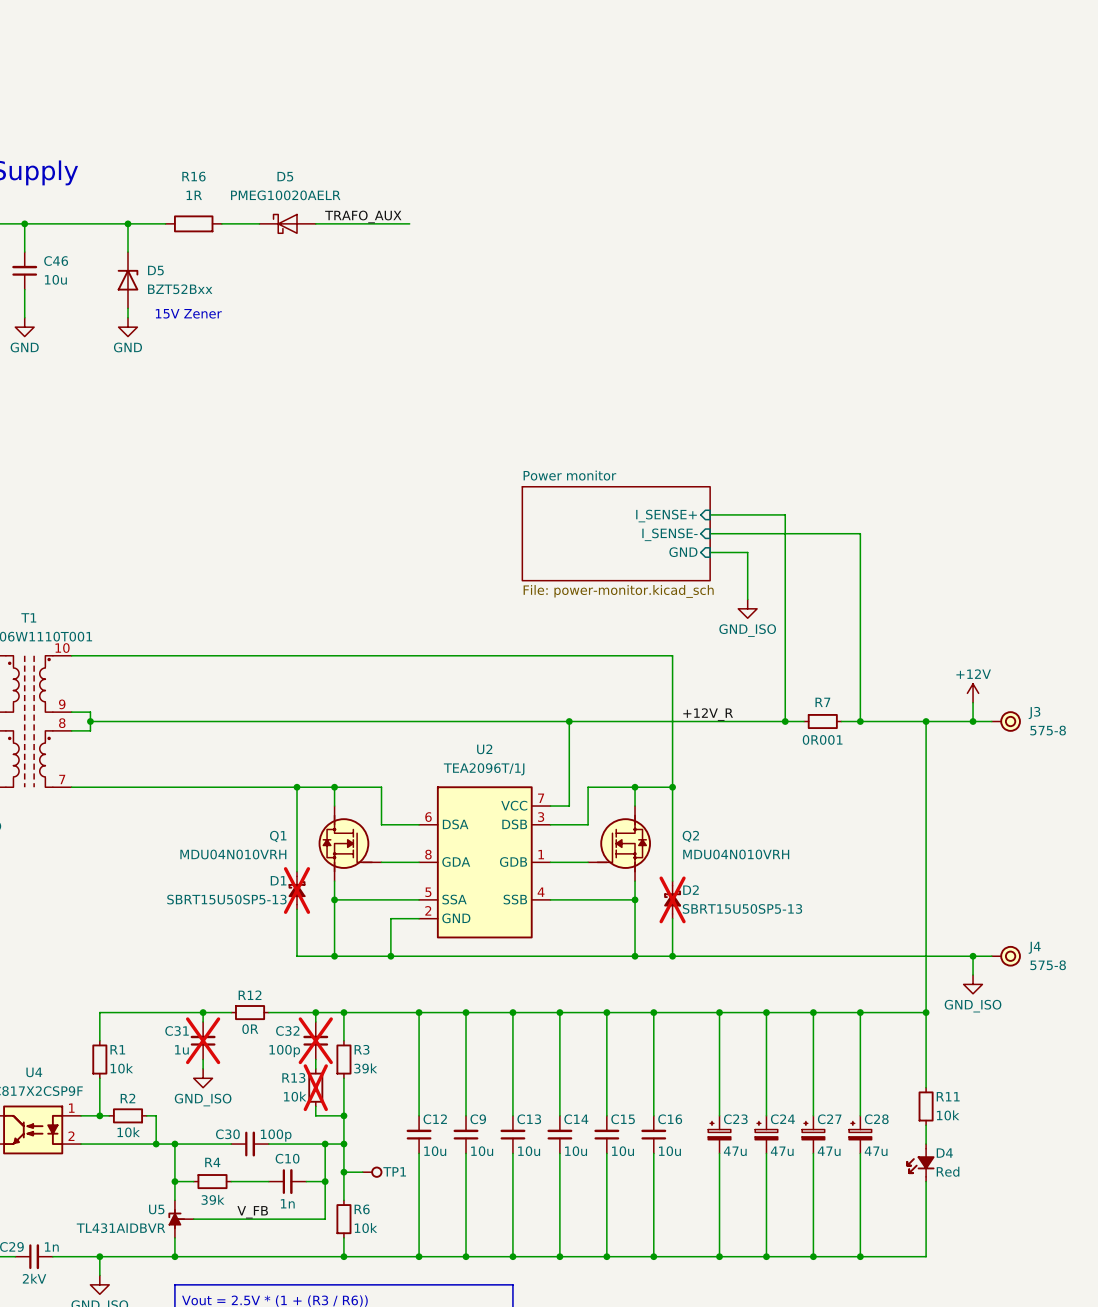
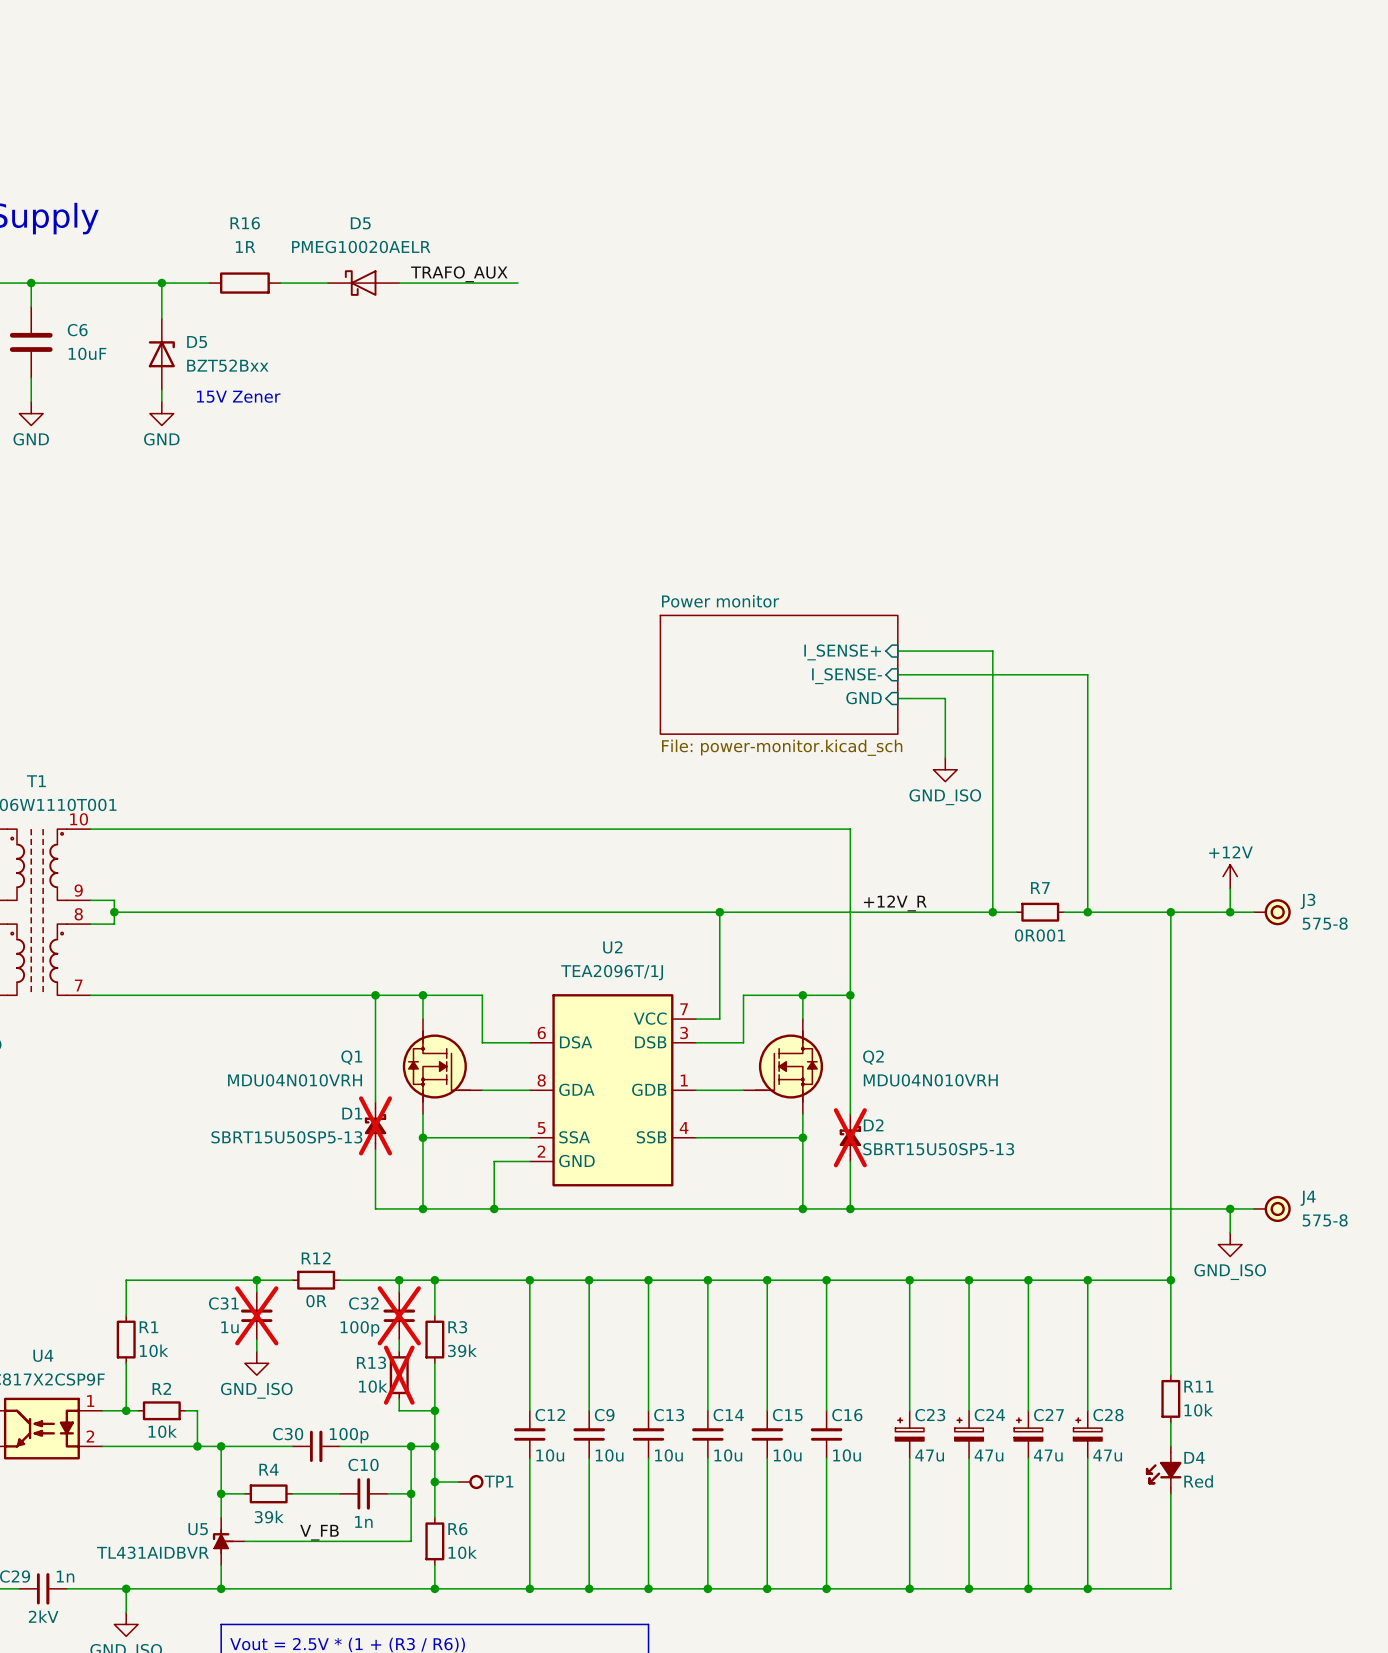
C46: (24, 270) -> none
C6: none -> 10uF (31, 342)

